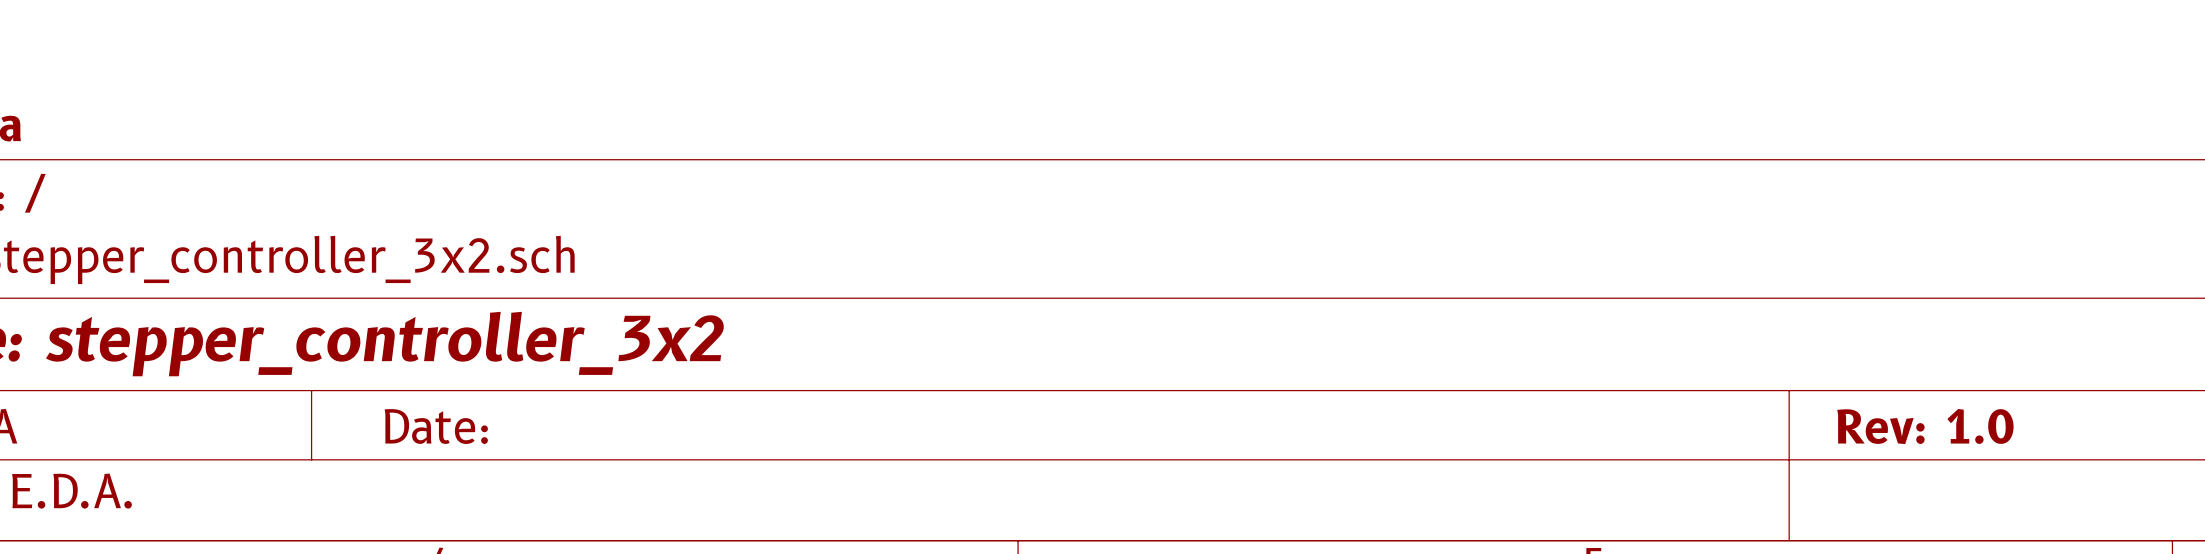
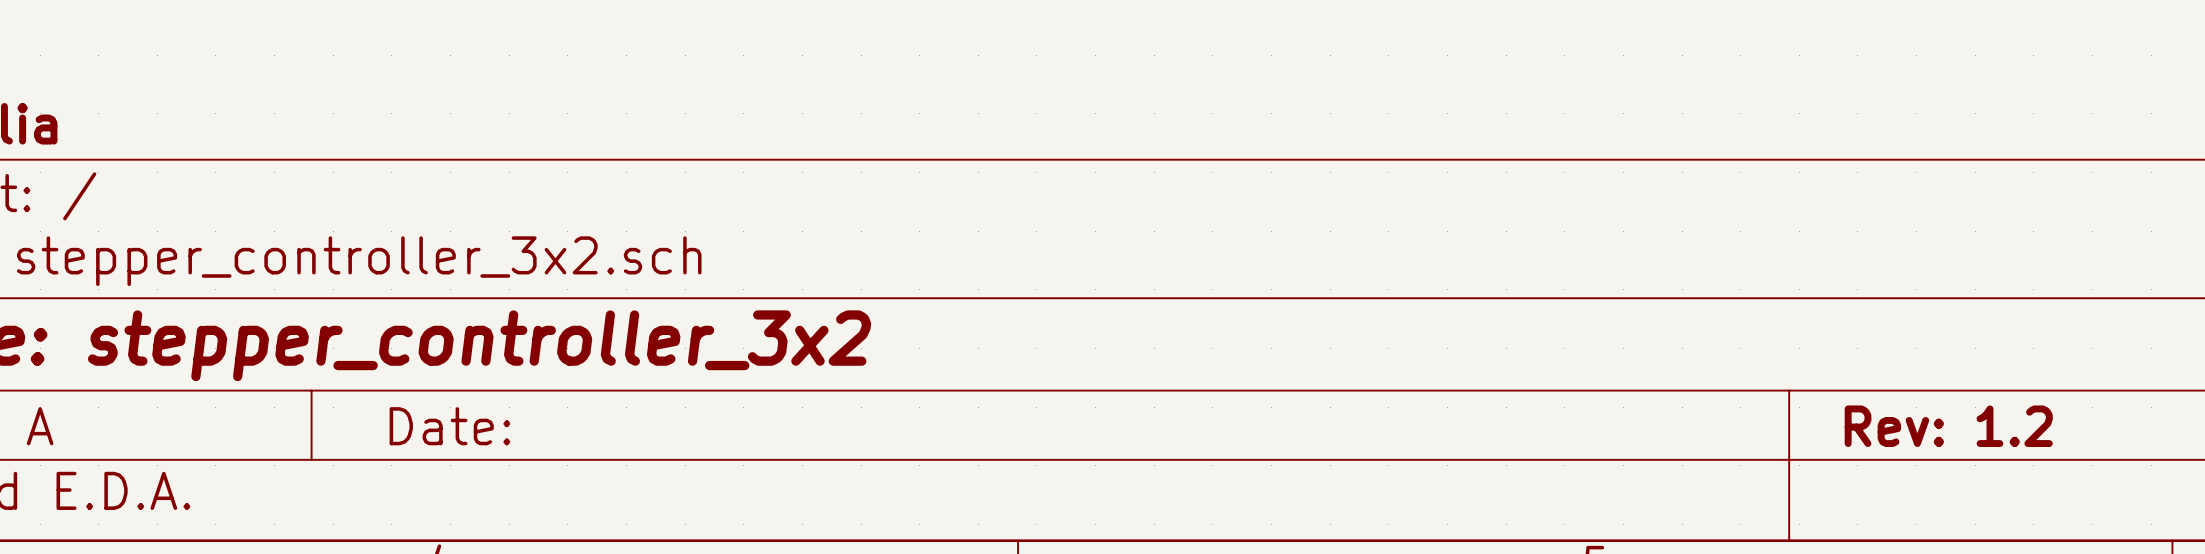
title block: Rev: 1.0 (1925, 426) -> Rev: 1.2 (1948, 426)

